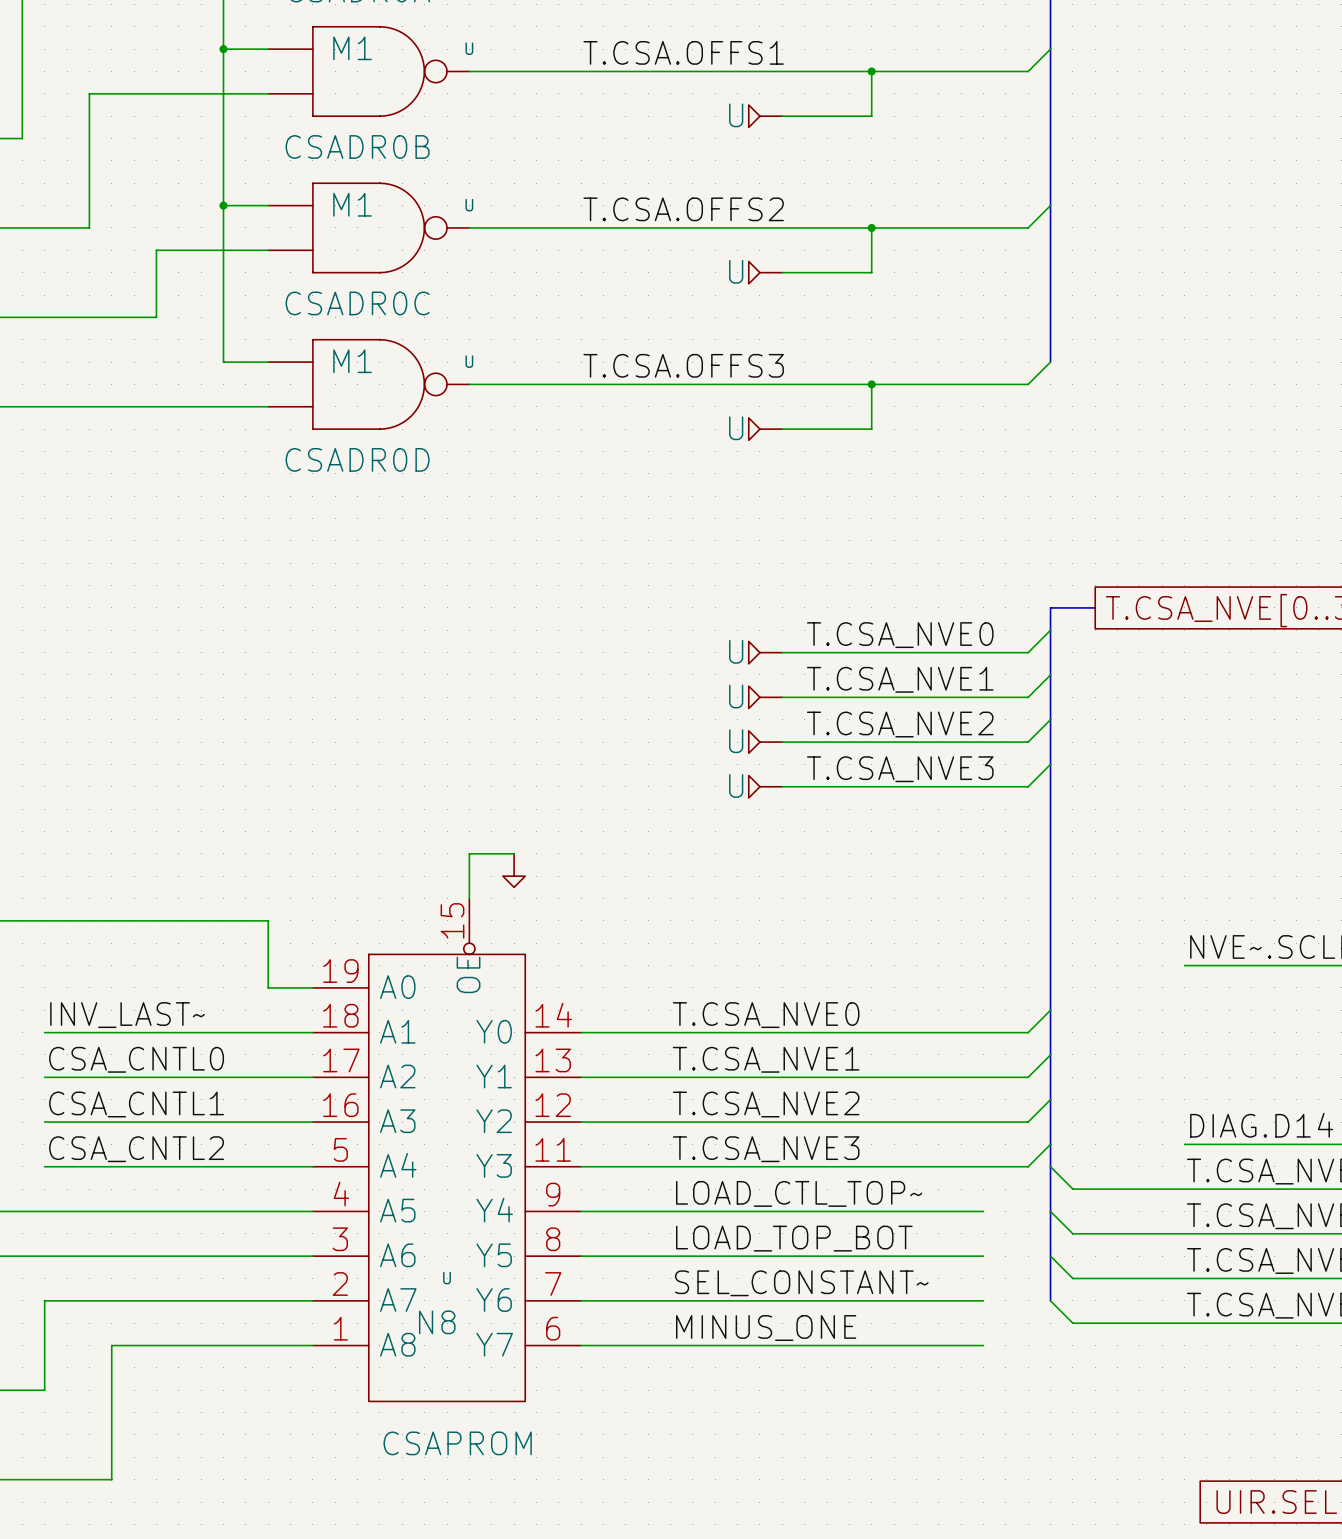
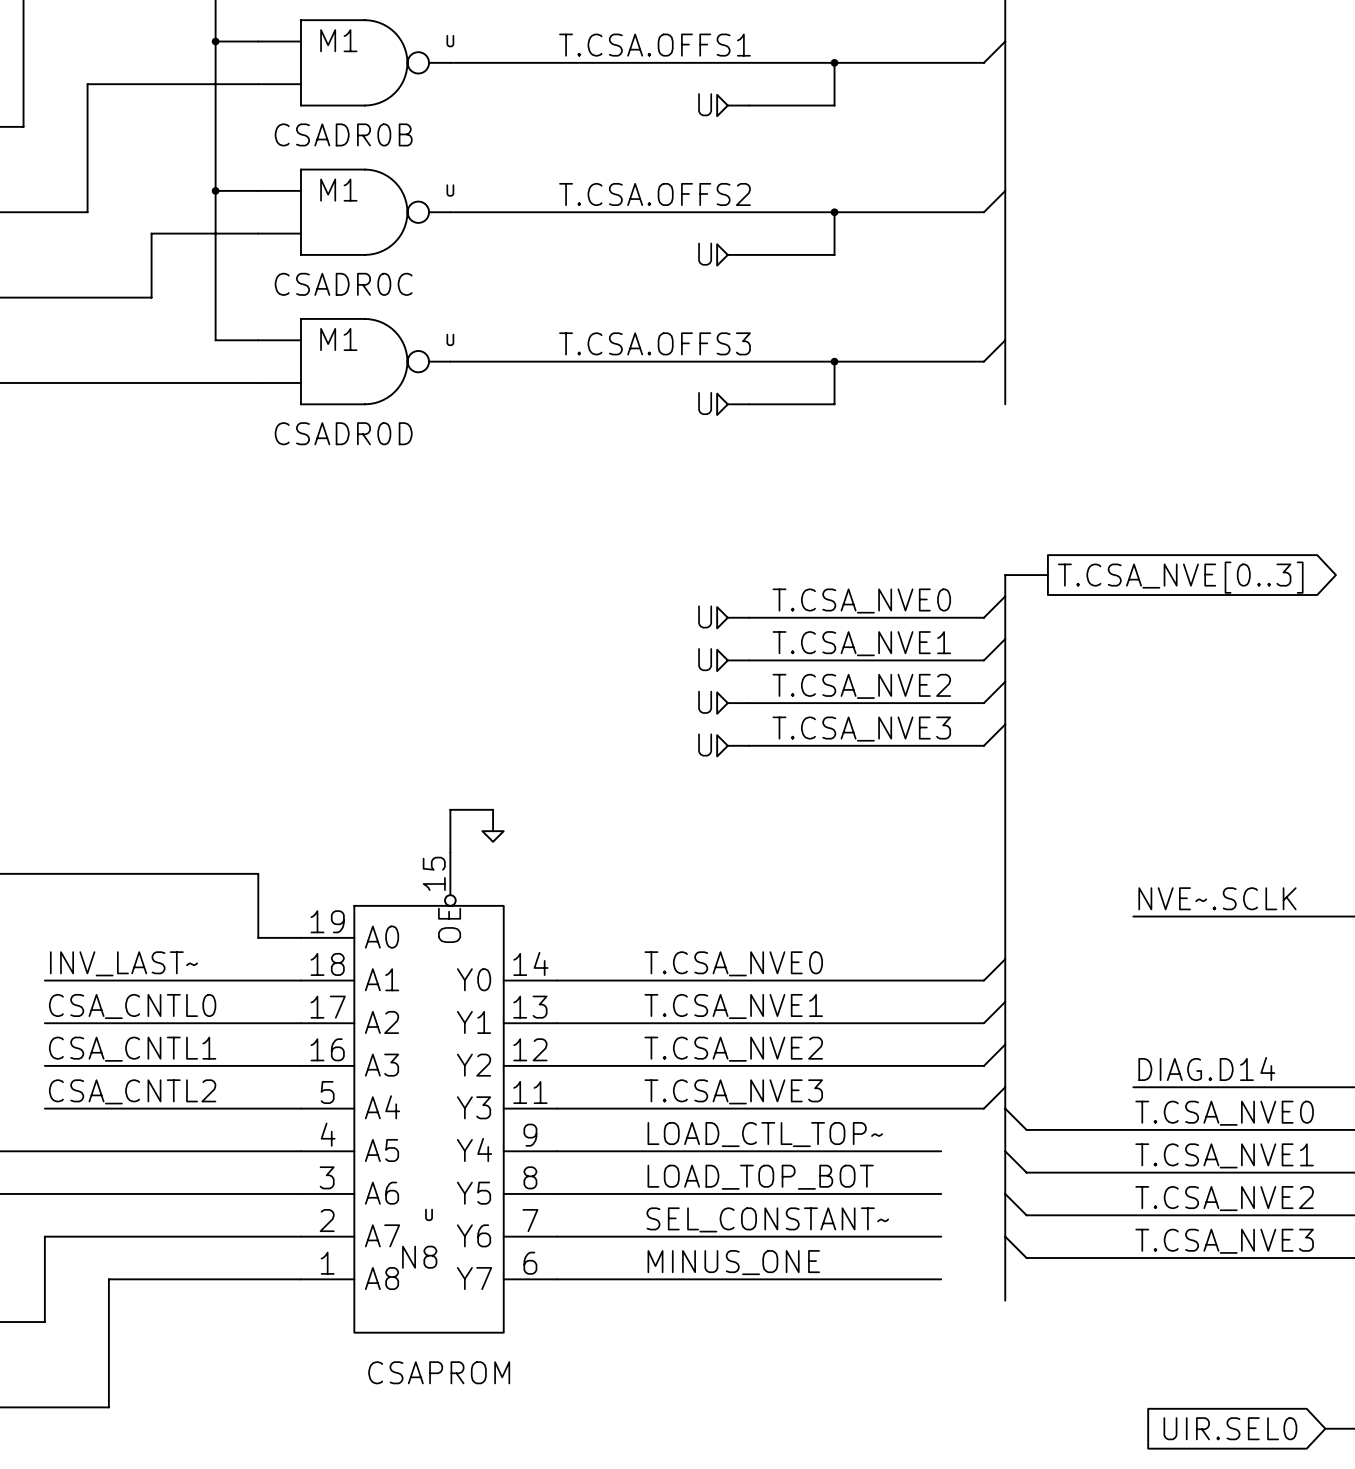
bus: none -> (1005, 340) (1005, 404)
bus: none -> (1005, 1236) (1005, 1300)

